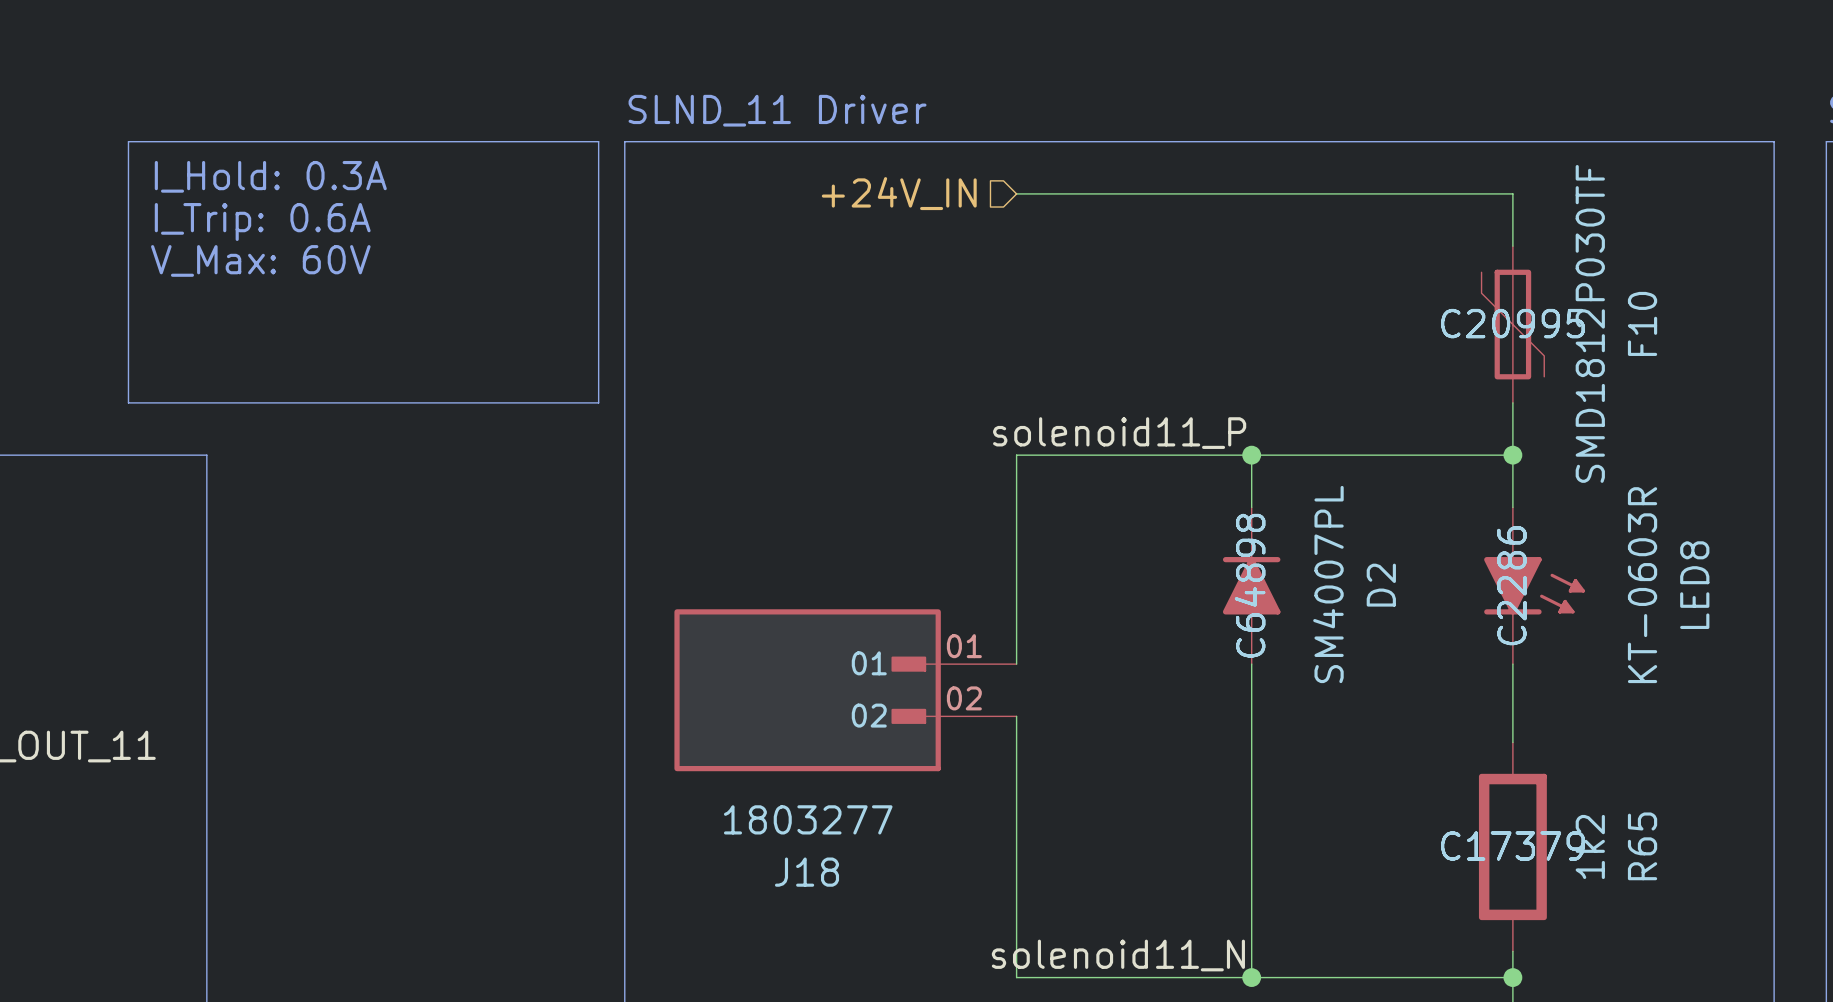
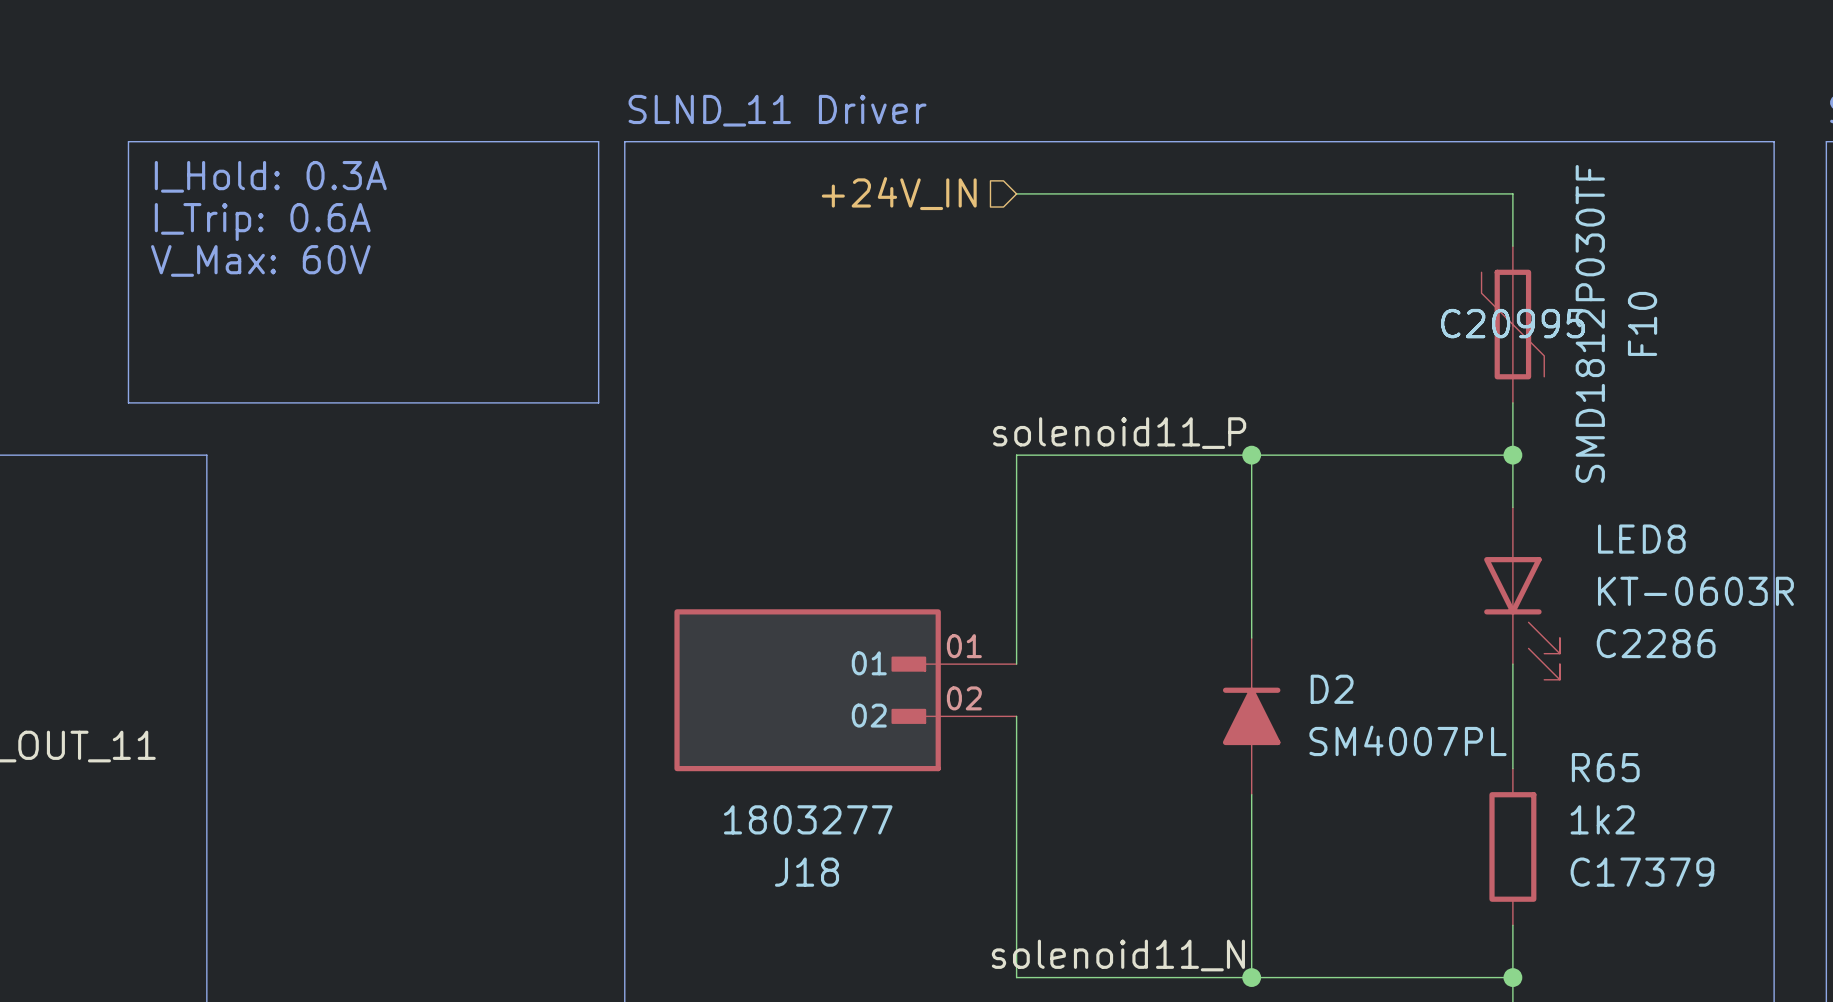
LED8 symbol: [1484, 507, 1585, 665] -> [1484, 507, 1560, 680]
D2 value rotation: 0° (1328, 584) -> 90° clockwise (1407, 740)
D2 text: C64898 (1250, 585) -> none
D2 text: C64898 (1250, 585) -> none
D2 position: (1251, 585) -> (1251, 716)
D2 name rotation: 0° (1381, 585) -> 90° clockwise (1332, 689)
LED8 text position: C2286 (1511, 585) -> C2286 (1656, 643)
LED8 text: C2286 (1511, 585) -> none
LED8 value position: KT-0603R (1642, 585) -> KT-0603R (1695, 591)
LED8 name position: LED8 (1694, 585) -> LED8 (1641, 539)
R65 symbol: [1478, 742, 1547, 952] -> [1489, 768, 1537, 926]
R65 text position: C17379 (1512, 845) -> C17379 (1642, 872)
R65 text: C17379 (1512, 845) -> none
R65 name position: R65 (1642, 846) -> R65 (1605, 767)

